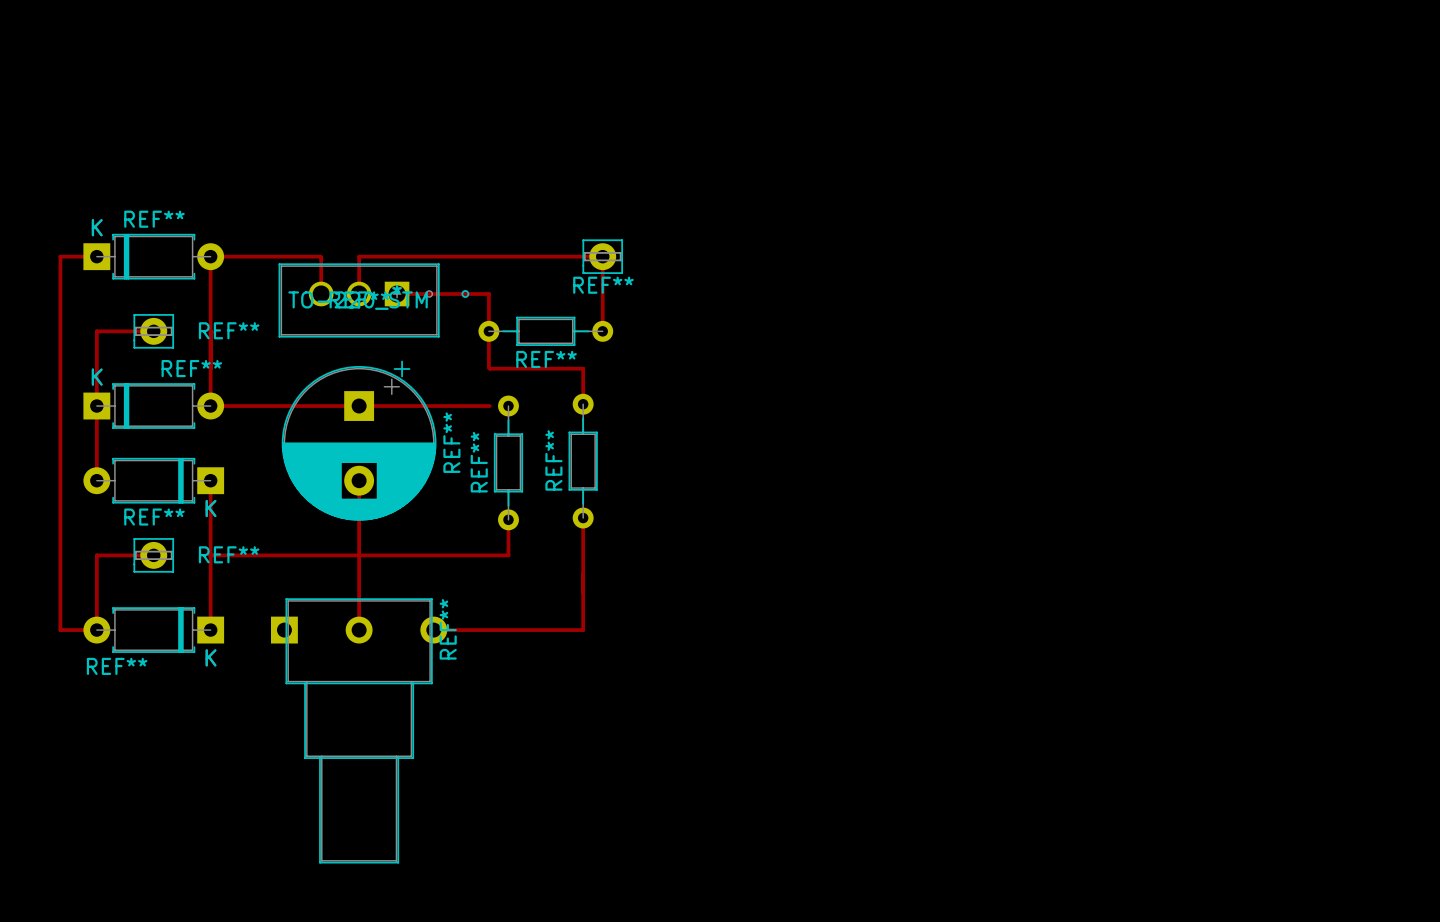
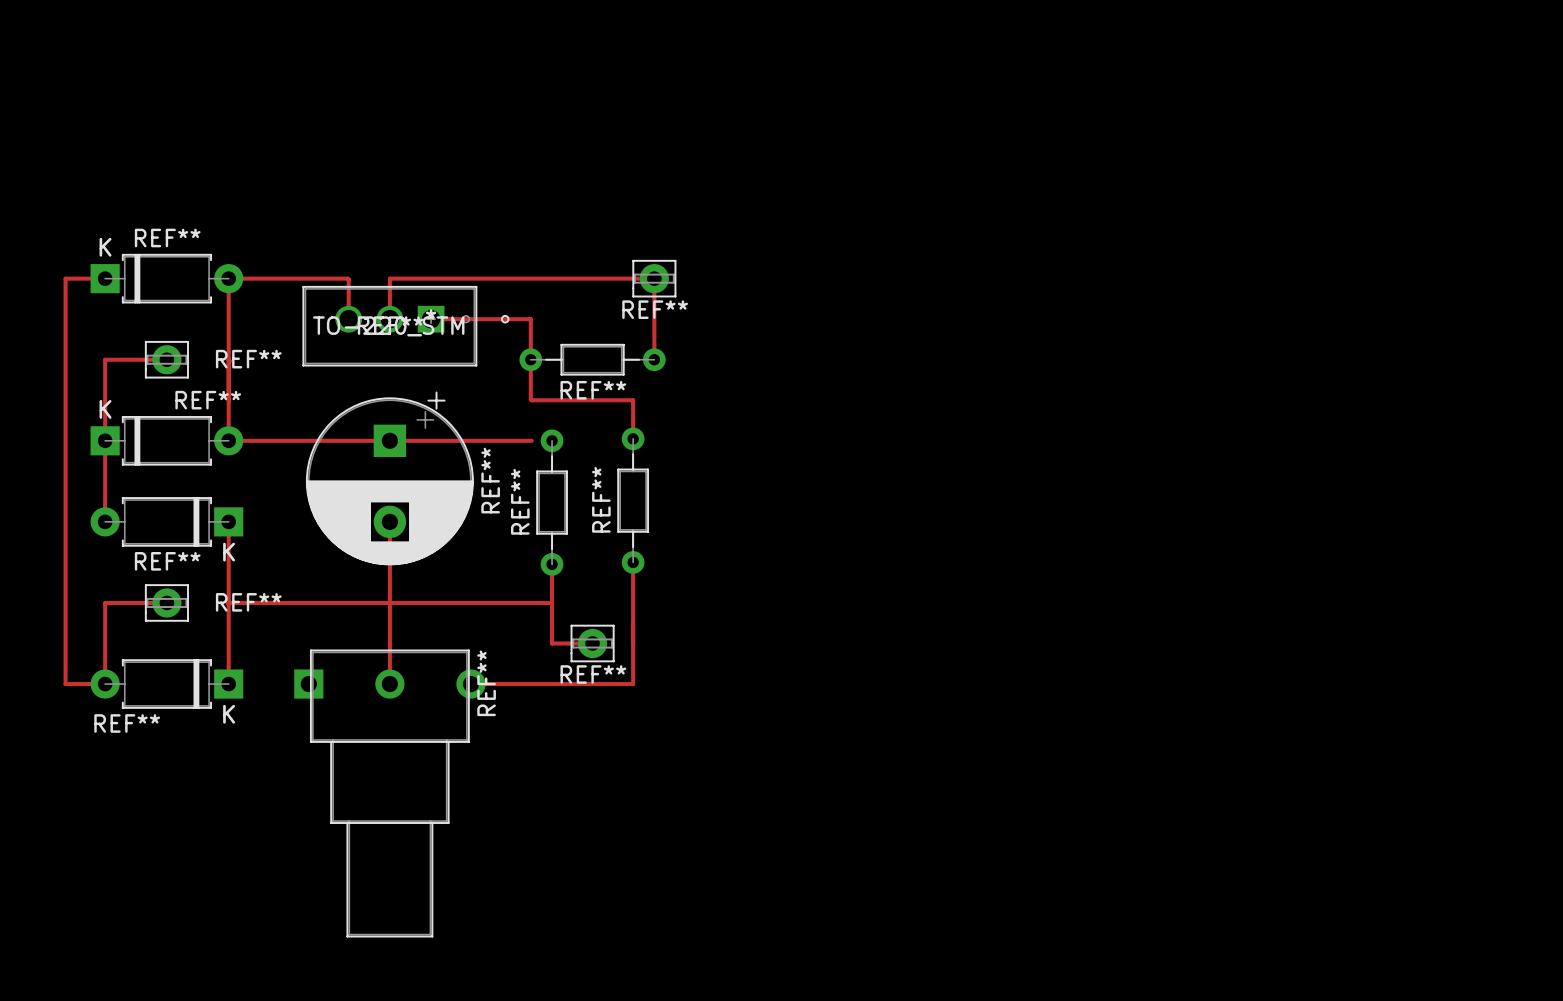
track: none -> (552, 602) (552, 643) (592, 643)
REF**: none -> (592, 643)

